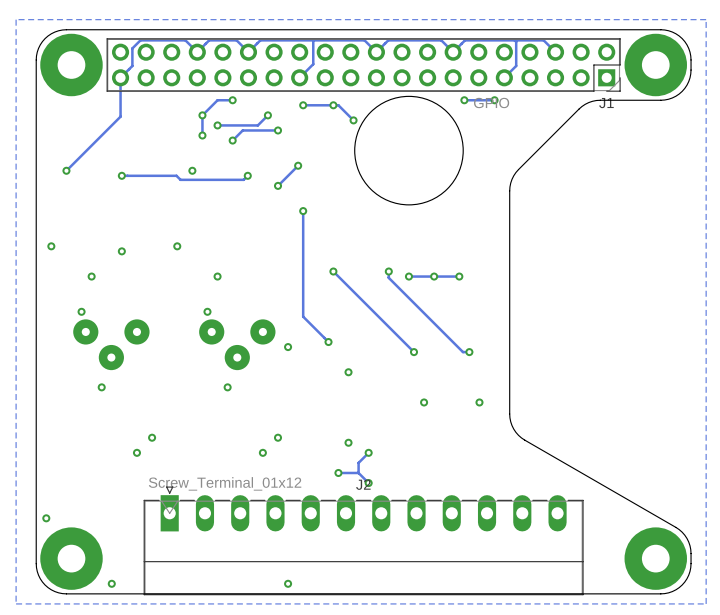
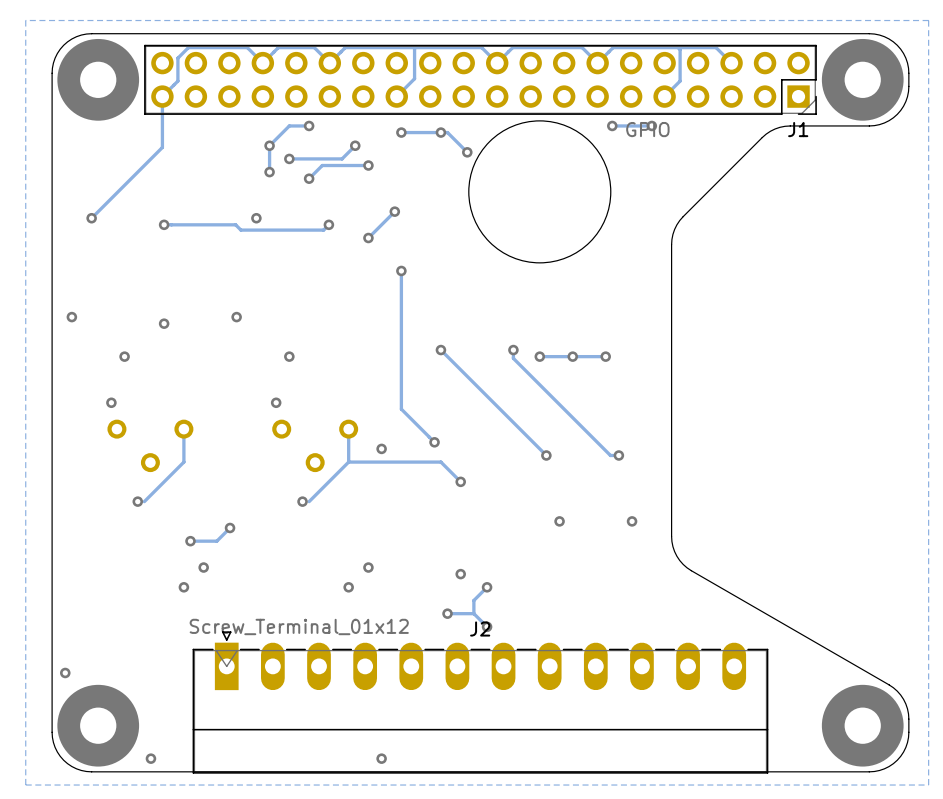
part footprint: [73, 319, 150, 371] -> [107, 419, 194, 473]
part footprint: [199, 319, 276, 371] -> [272, 419, 359, 473]
track: none -> (183, 429) (183, 462) (144, 501)
track: none -> (348, 429) (348, 462)
track: none -> (348, 462) (309, 501)
track: none -> (348, 462) (440, 462) (460, 481)
track: none -> (230, 527) (216, 541) (190, 541)
via: none -> (230, 527)
via: none -> (190, 541)

